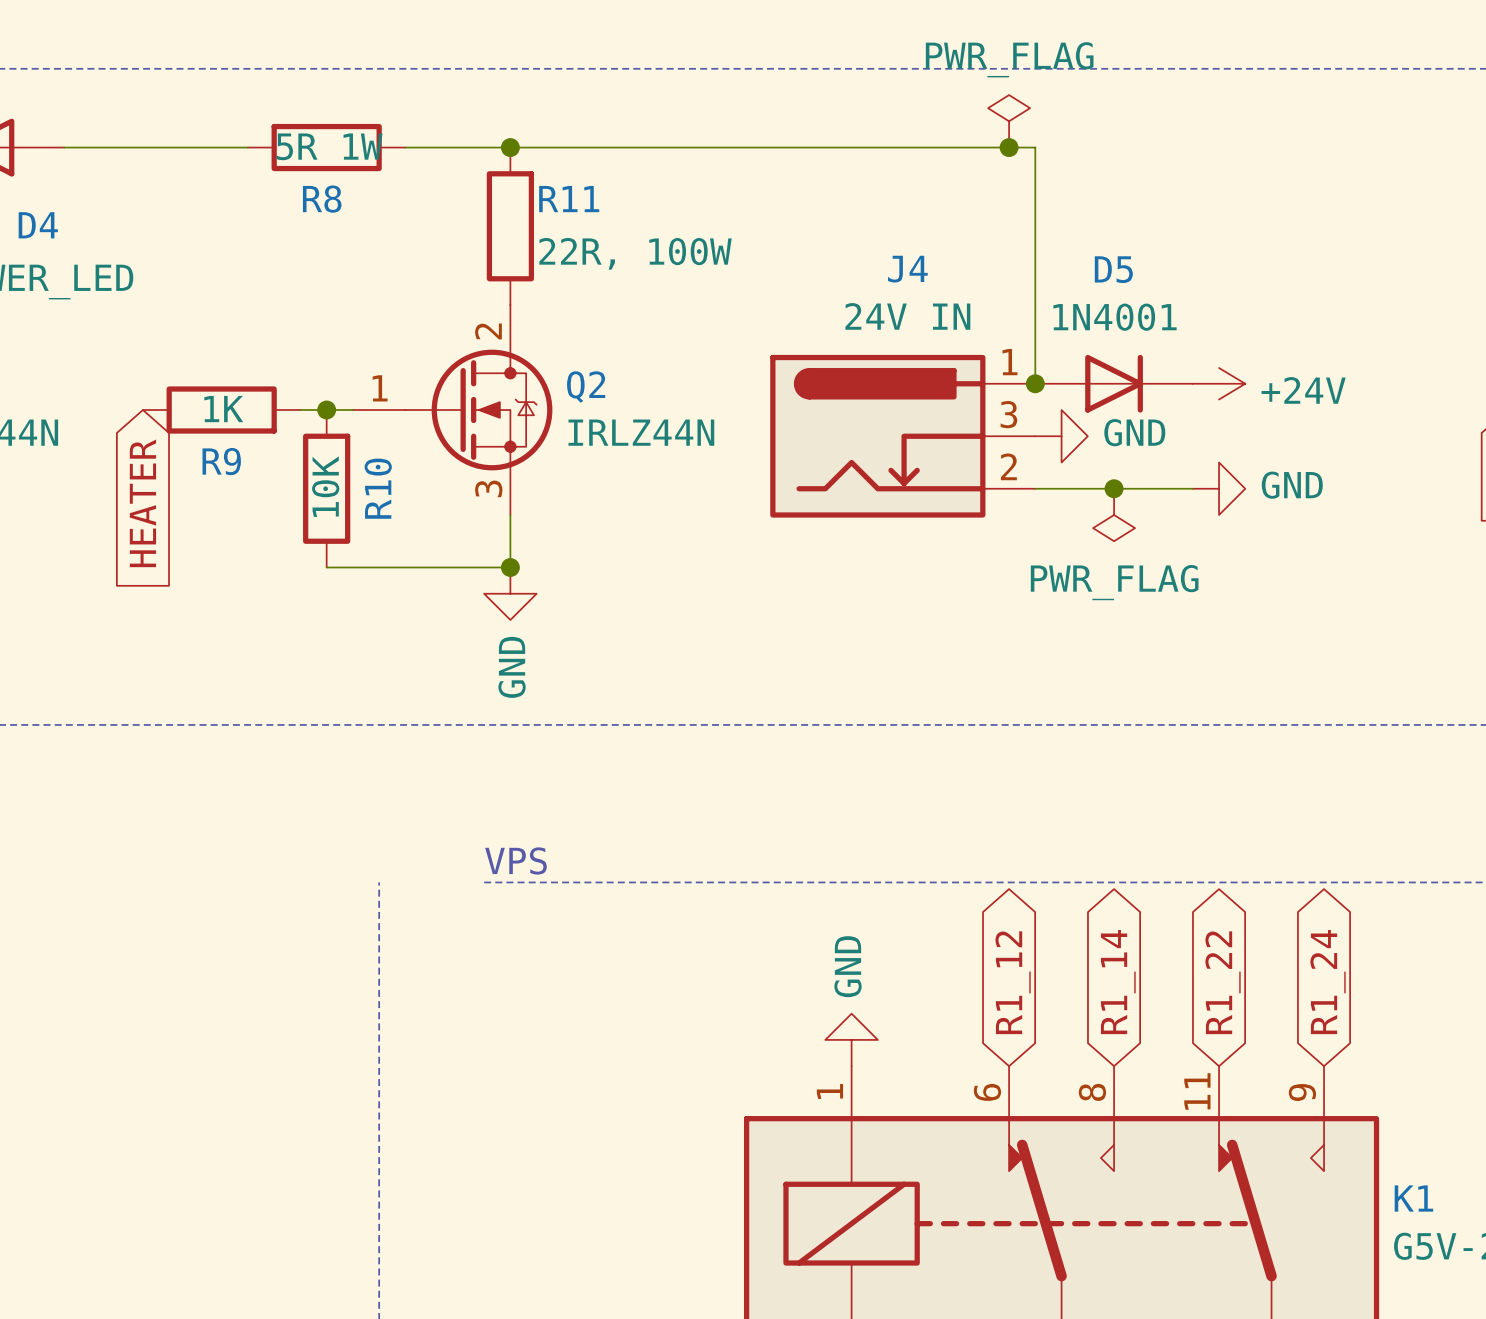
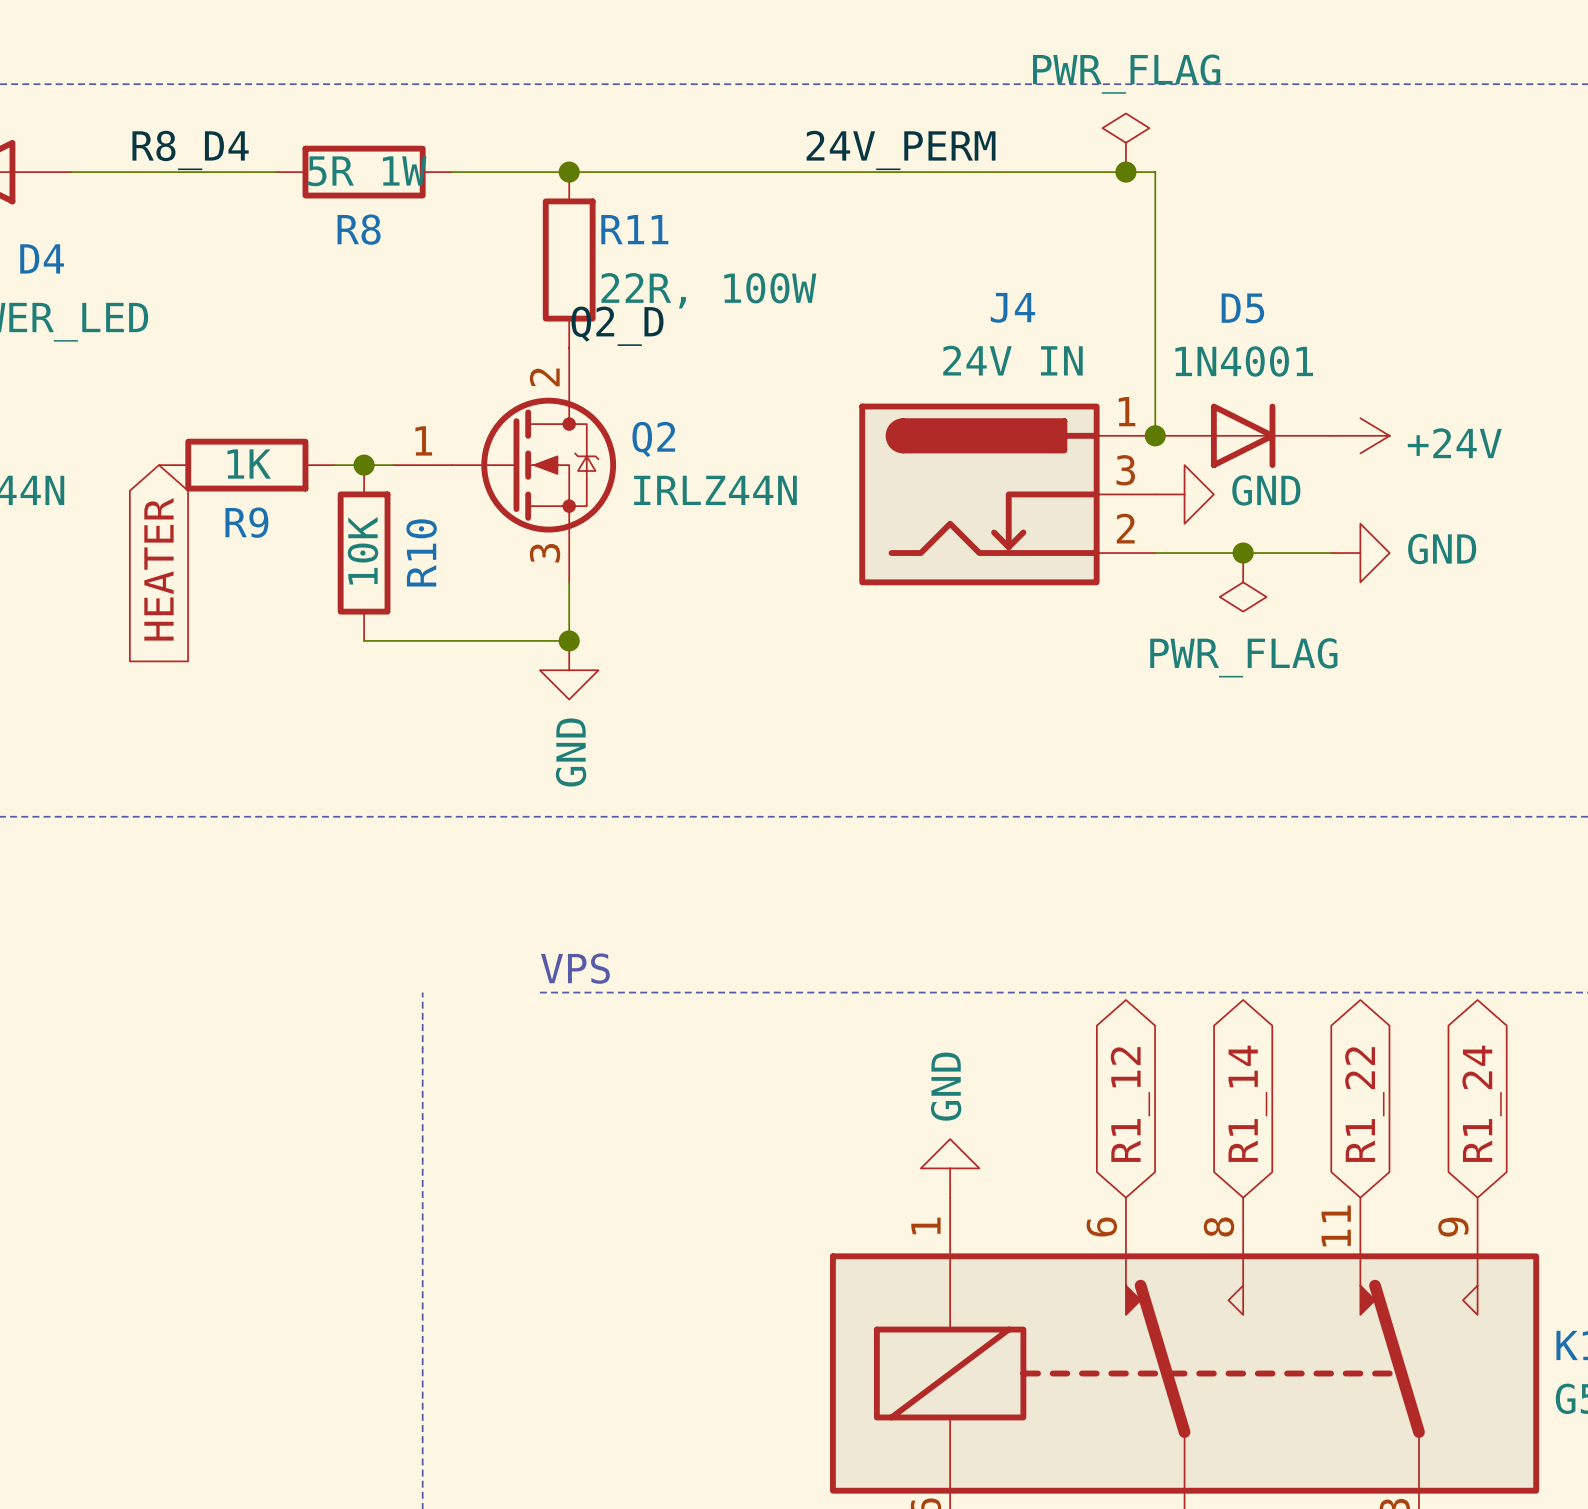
label: none -> R8_D4 (190, 150)
label: none -> 24V_PERM (901, 150)
label: none -> Q2_D (617, 326)

